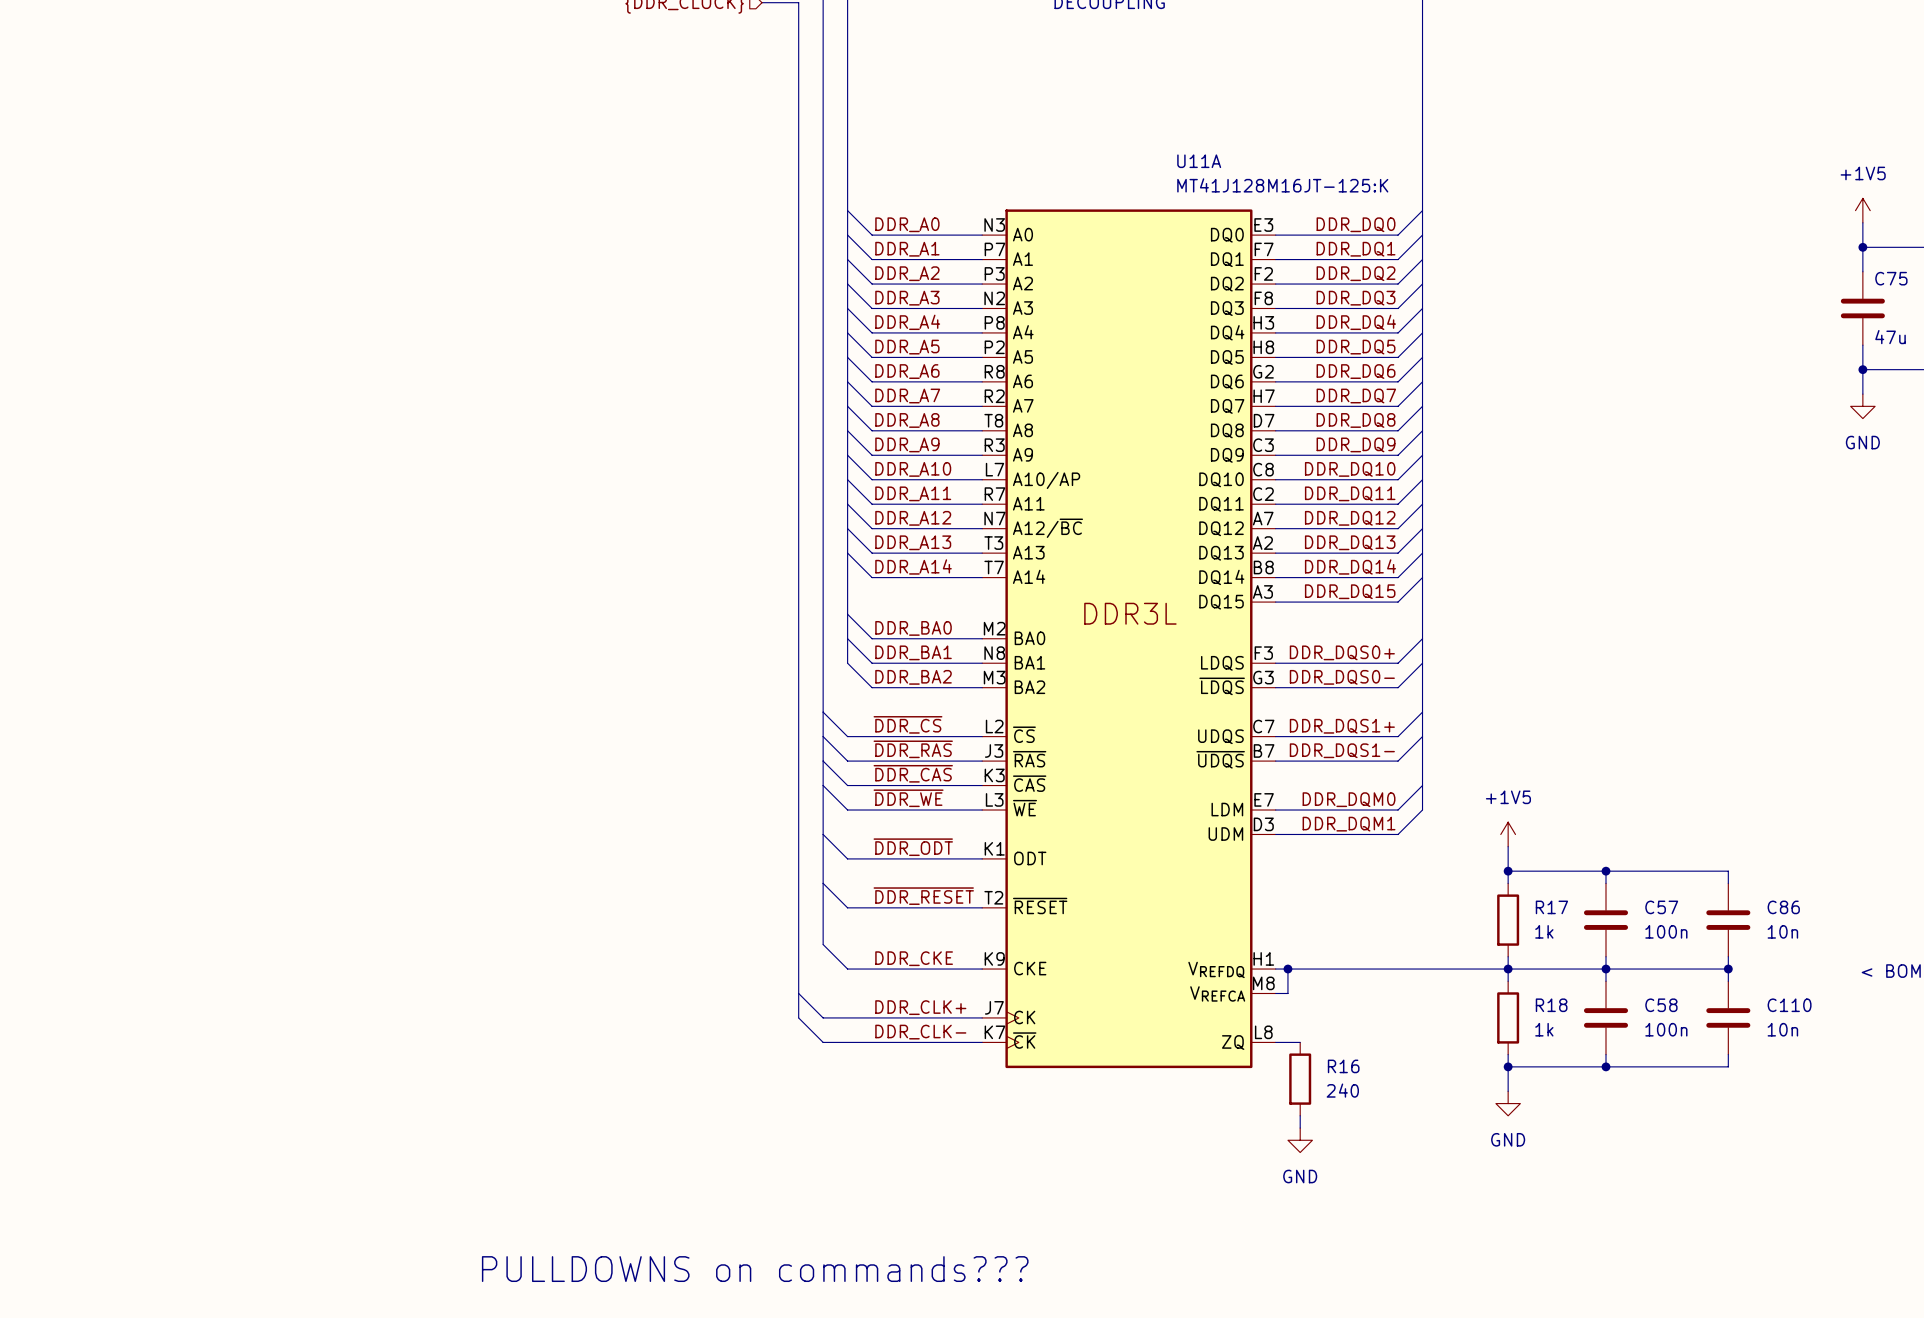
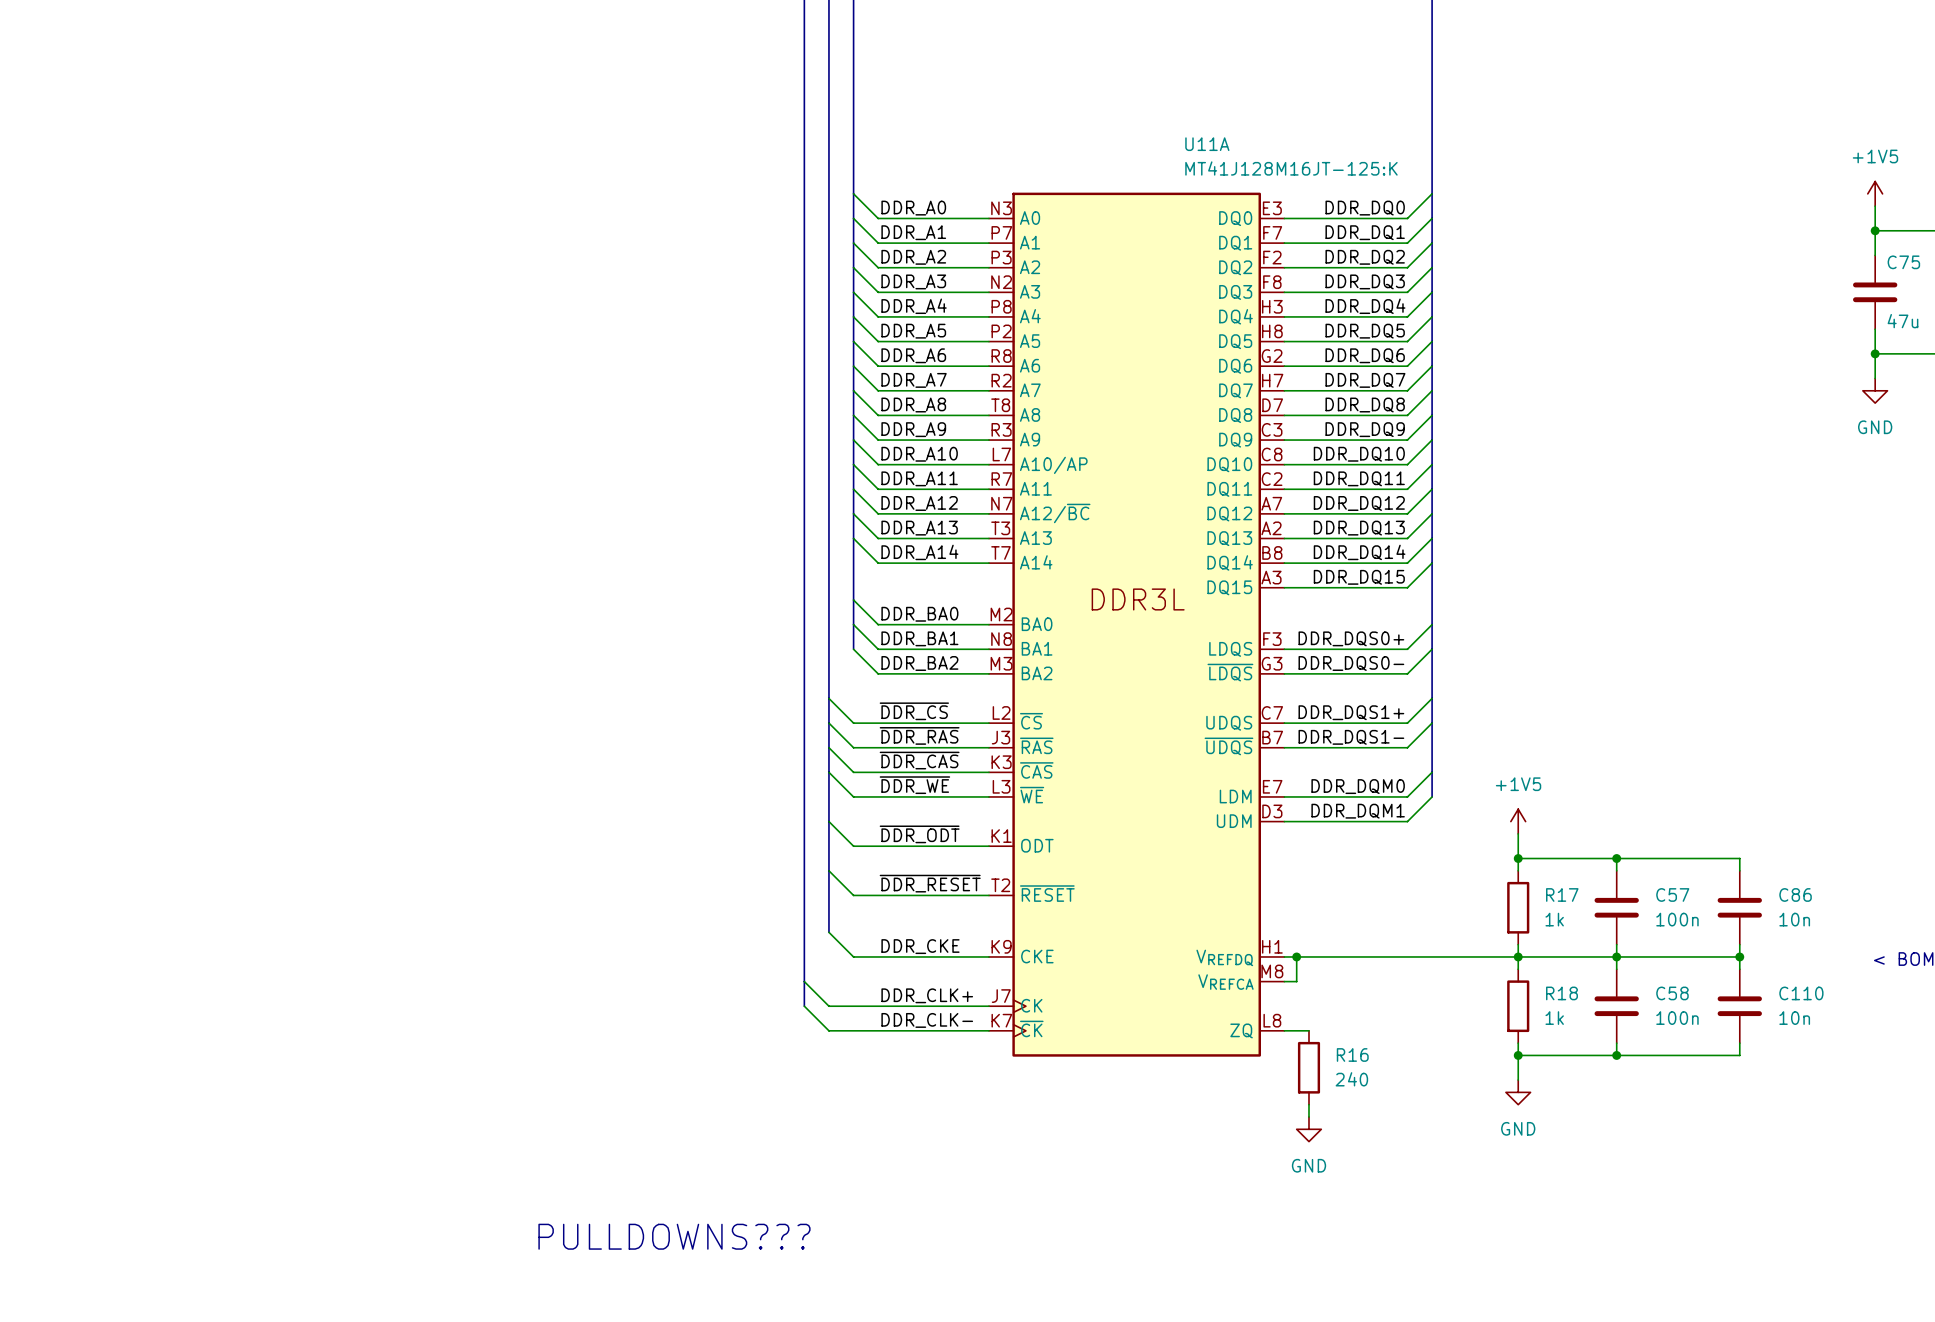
text: PULLDOWNS on commands??? (755, 1269) -> PULLDOWNS??? (674, 1236)

